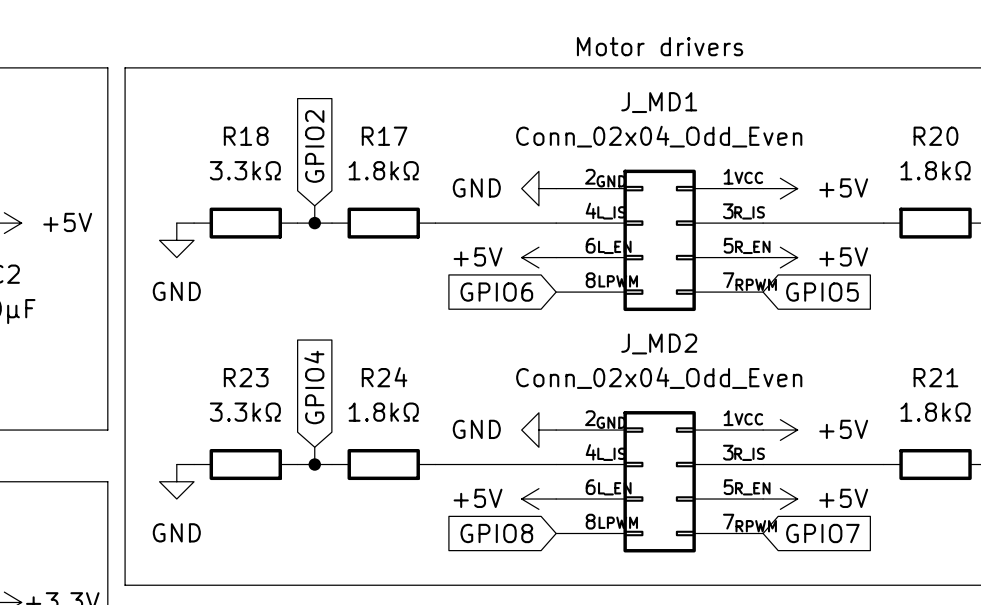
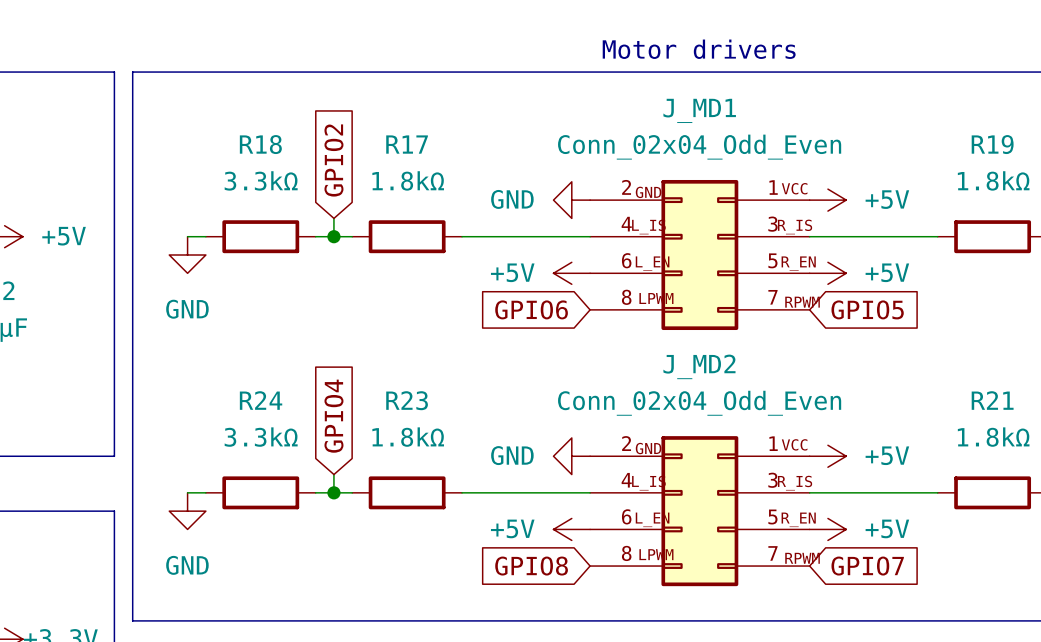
R20 name: R20 (935, 136) -> R19 (992, 144)
R23 name: R23 (246, 377) -> R24 (261, 400)
R24 name: R24 (384, 377) -> R23 (407, 400)

